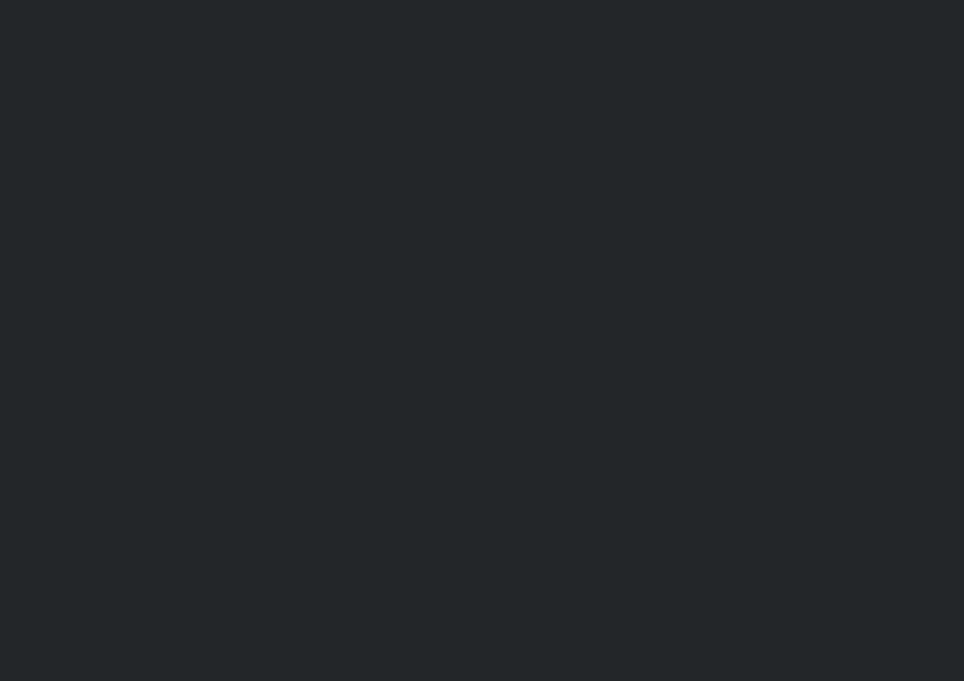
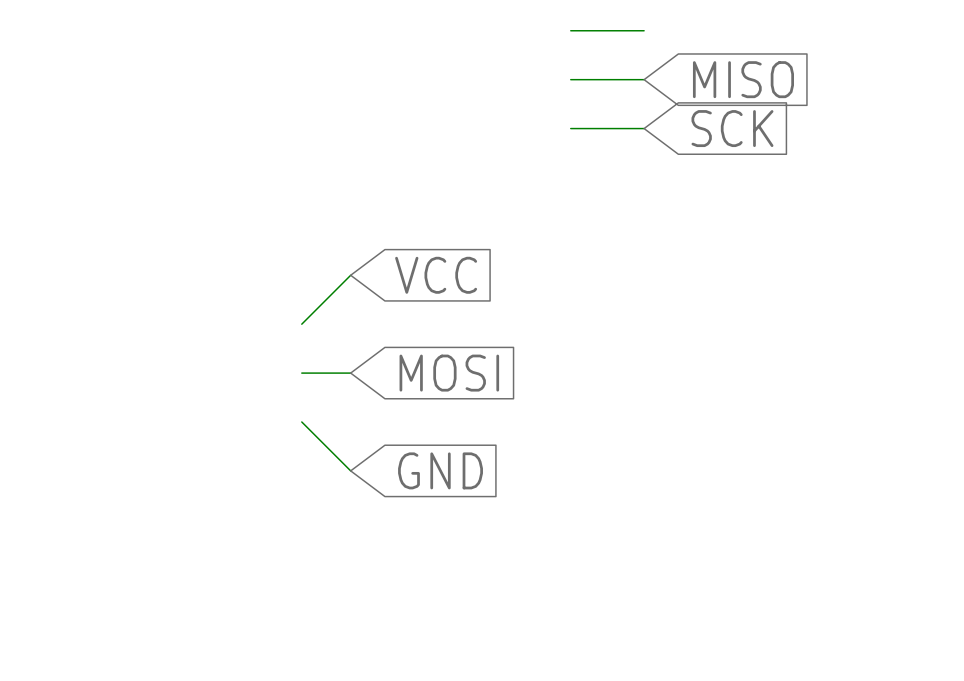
wire: none -> (570, 30) (644, 30)
wire: none -> (570, 79) (644, 79)
global label: none -> MISO (743, 79)
wire: none -> (570, 128) (644, 128)
global label: none -> SCK (732, 128)
wire: none -> (350, 275) (301, 324)
global label: none -> VCC (436, 275)
wire: none -> (301, 373) (350, 373)
global label: none -> MOSI (449, 373)
wire: none -> (301, 421) (350, 470)
global label: none -> GND (440, 470)

